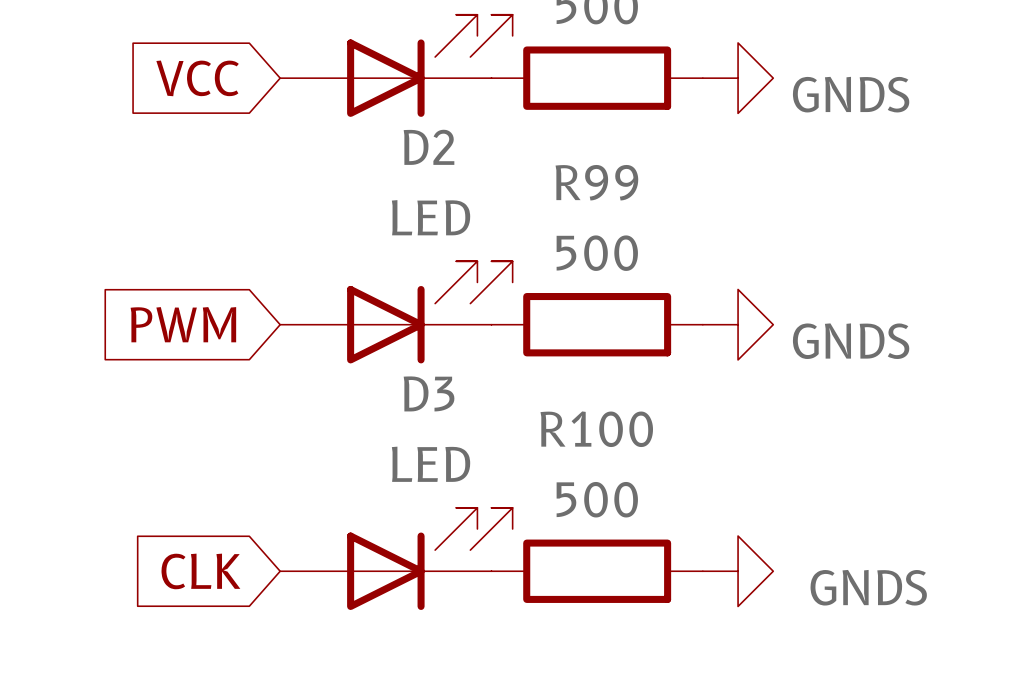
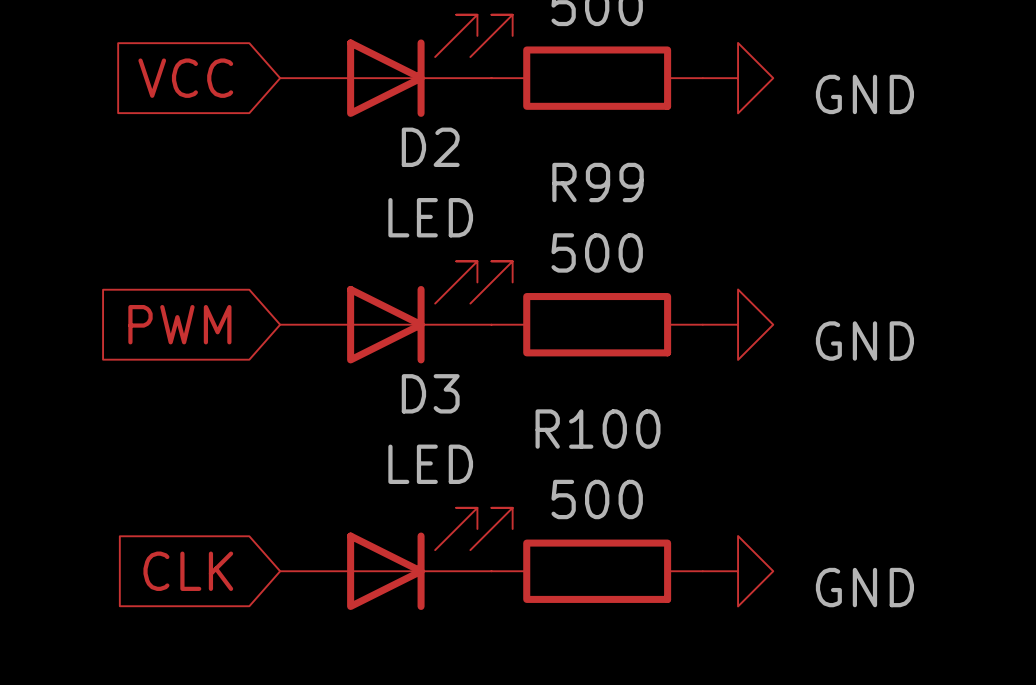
power symbol: GNDS (738, 78) -> GND (738, 78)
power symbol: GNDS (738, 324) -> GND (738, 324)
power symbol: GNDS (738, 571) -> GND (738, 571)

